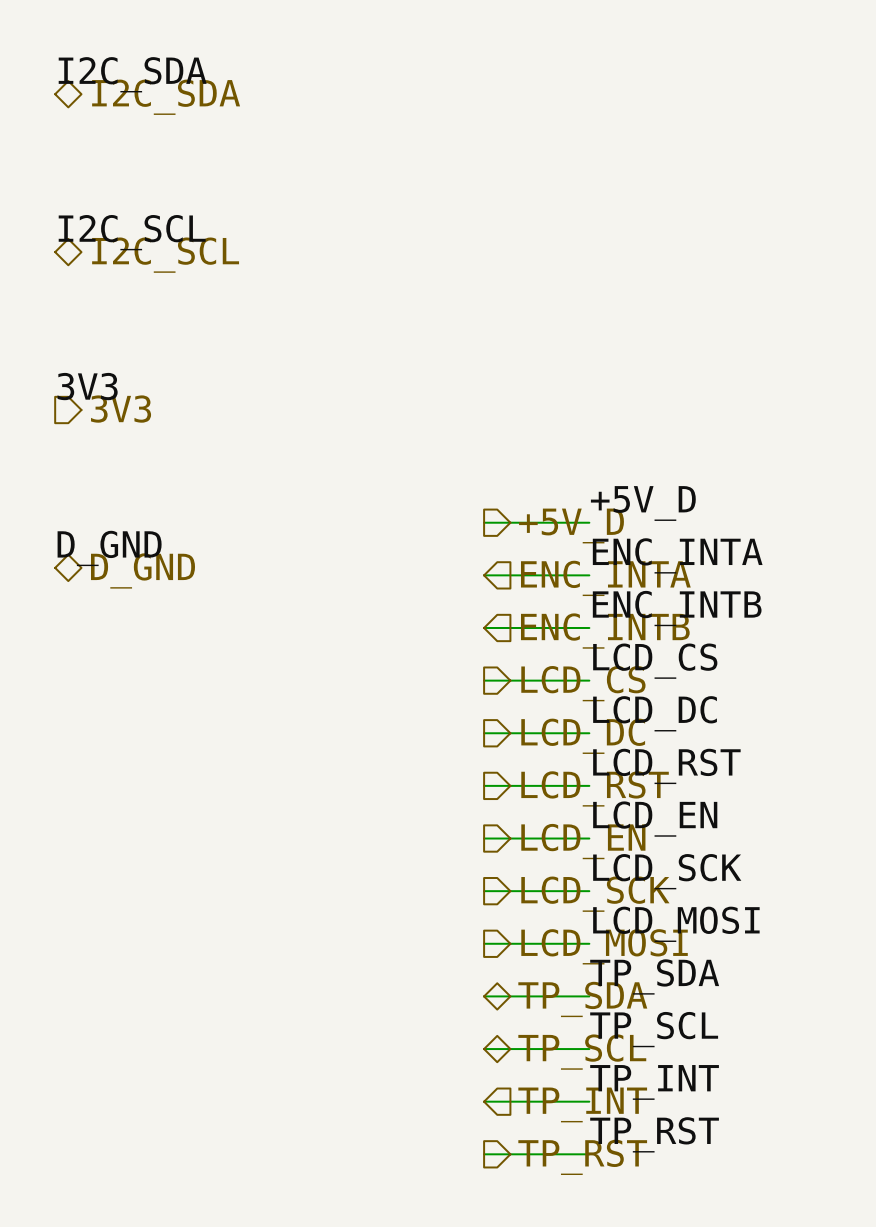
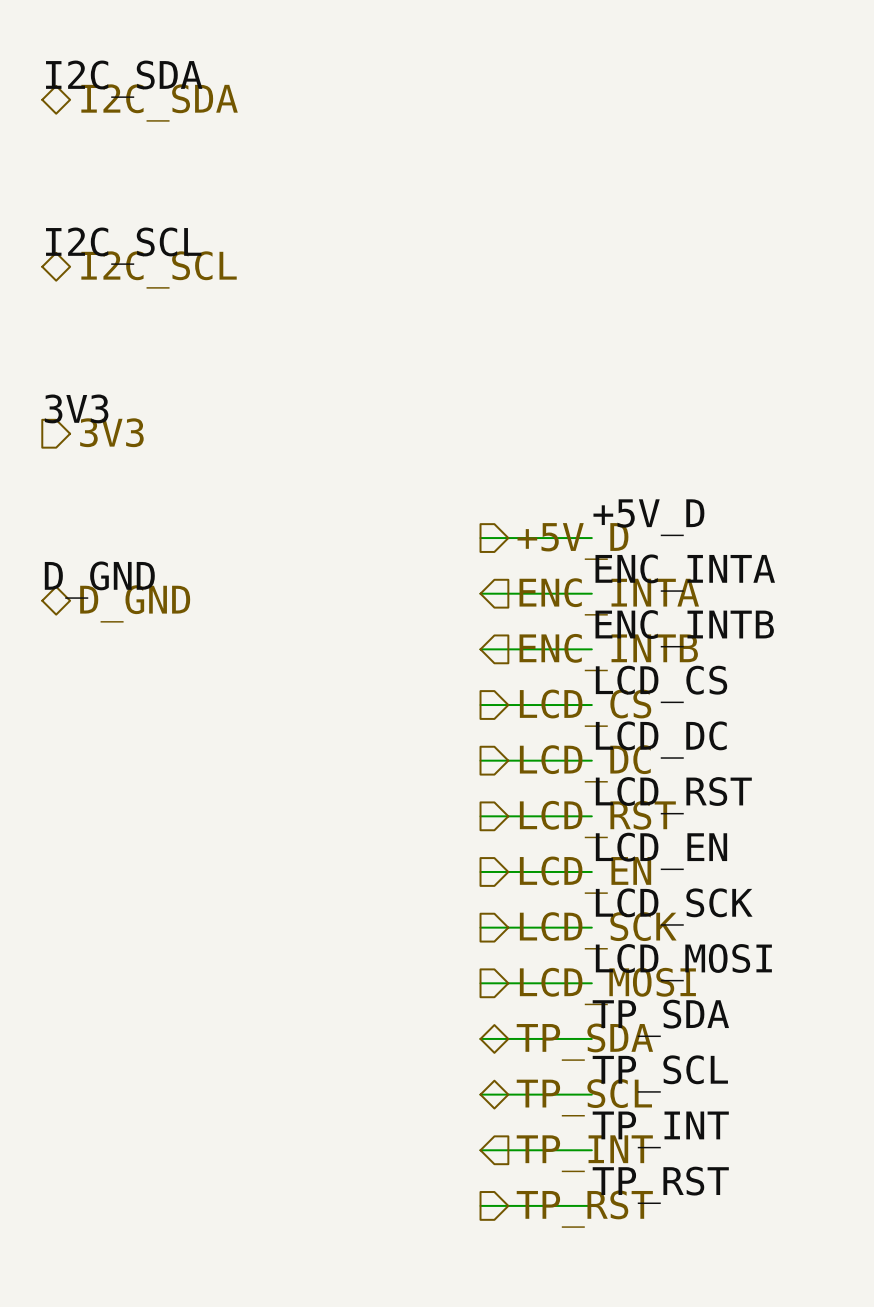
label position: +5V_D (643, 503) -> +5V_D (648, 517)
wire: (484, 522) (589, 522) -> (480, 538) (591, 538)
hierarchical label position: +5V_D (571, 526) -> +5V_D (572, 541)
label position: ENC_INTA (677, 555) -> ENC_INTA (685, 573)
wire: (484, 575) (589, 575) -> (480, 593) (591, 593)
hierarchical label position: ENC_INTA (605, 578) -> ENC_INTA (609, 596)
label position: ENC_INTB (677, 608) -> ENC_INTB (684, 628)
wire: (484, 627) (589, 627) -> (480, 649) (591, 649)
hierarchical label position: ENC_INTB (605, 631) -> ENC_INTB (608, 652)
label position: LCD_CS (655, 661) -> LCD_CS (661, 684)
wire: (484, 680) (589, 680) -> (480, 705) (591, 705)
hierarchical label position: LCD_CS (583, 683) -> LCD_CS (585, 708)
label position: LCD_DC (655, 713) -> LCD_DC (661, 740)
wire: (484, 733) (589, 733) -> (480, 760) (591, 760)
hierarchical label position: LCD_DC (583, 736) -> LCD_DC (585, 763)
label position: LCD_RST (666, 766) -> LCD_RST (673, 795)
wire: (484, 785) (589, 785) -> (480, 816) (591, 816)
hierarchical label position: LCD_RST (595, 788) -> LCD_RST (597, 819)
label position: LCD_EN (655, 819) -> LCD_EN (661, 851)
wire: (484, 838) (589, 838) -> (480, 871) (591, 871)
hierarchical label position: LCD_EN (583, 841) -> LCD_EN (585, 875)
label position: LCD_SCK (667, 871) -> LCD_SCK (674, 907)
wire: (484, 891) (589, 891) -> (480, 927) (591, 927)
hierarchical label position: LCD_SCK (595, 894) -> LCD_SCK (598, 930)
label position: LCD_MOSI (676, 924) -> LCD_MOSI (683, 962)
wire: (484, 943) (589, 943) -> (480, 983) (591, 983)
hierarchical label position: LCD_MOSI (604, 946) -> LCD_MOSI (607, 986)
label position: TP_SDA (654, 976) -> TP_SDA (660, 1018)
wire: (484, 996) (589, 996) -> (480, 1038) (591, 1038)
hierarchical label position: TP_SDA (582, 999) -> TP_SDA (584, 1042)
label position: TP_SCL (654, 1029) -> TP_SCL (660, 1074)
wire: (484, 1049) (589, 1049) -> (480, 1094) (591, 1094)
hierarchical label position: TP_SCL (582, 1052) -> TP_SCL (584, 1097)
label position: TP_INT (654, 1082) -> TP_INT (660, 1129)
wire: (484, 1101) (589, 1101) -> (480, 1150) (591, 1150)
hierarchical label position: TP_INT (582, 1104) -> TP_INT (584, 1153)
label position: TP_RST (654, 1134) -> TP_RST (660, 1185)
wire: (484, 1154) (589, 1154) -> (480, 1205) (591, 1205)
hierarchical label position: TP_RST (582, 1157) -> TP_RST (584, 1209)

